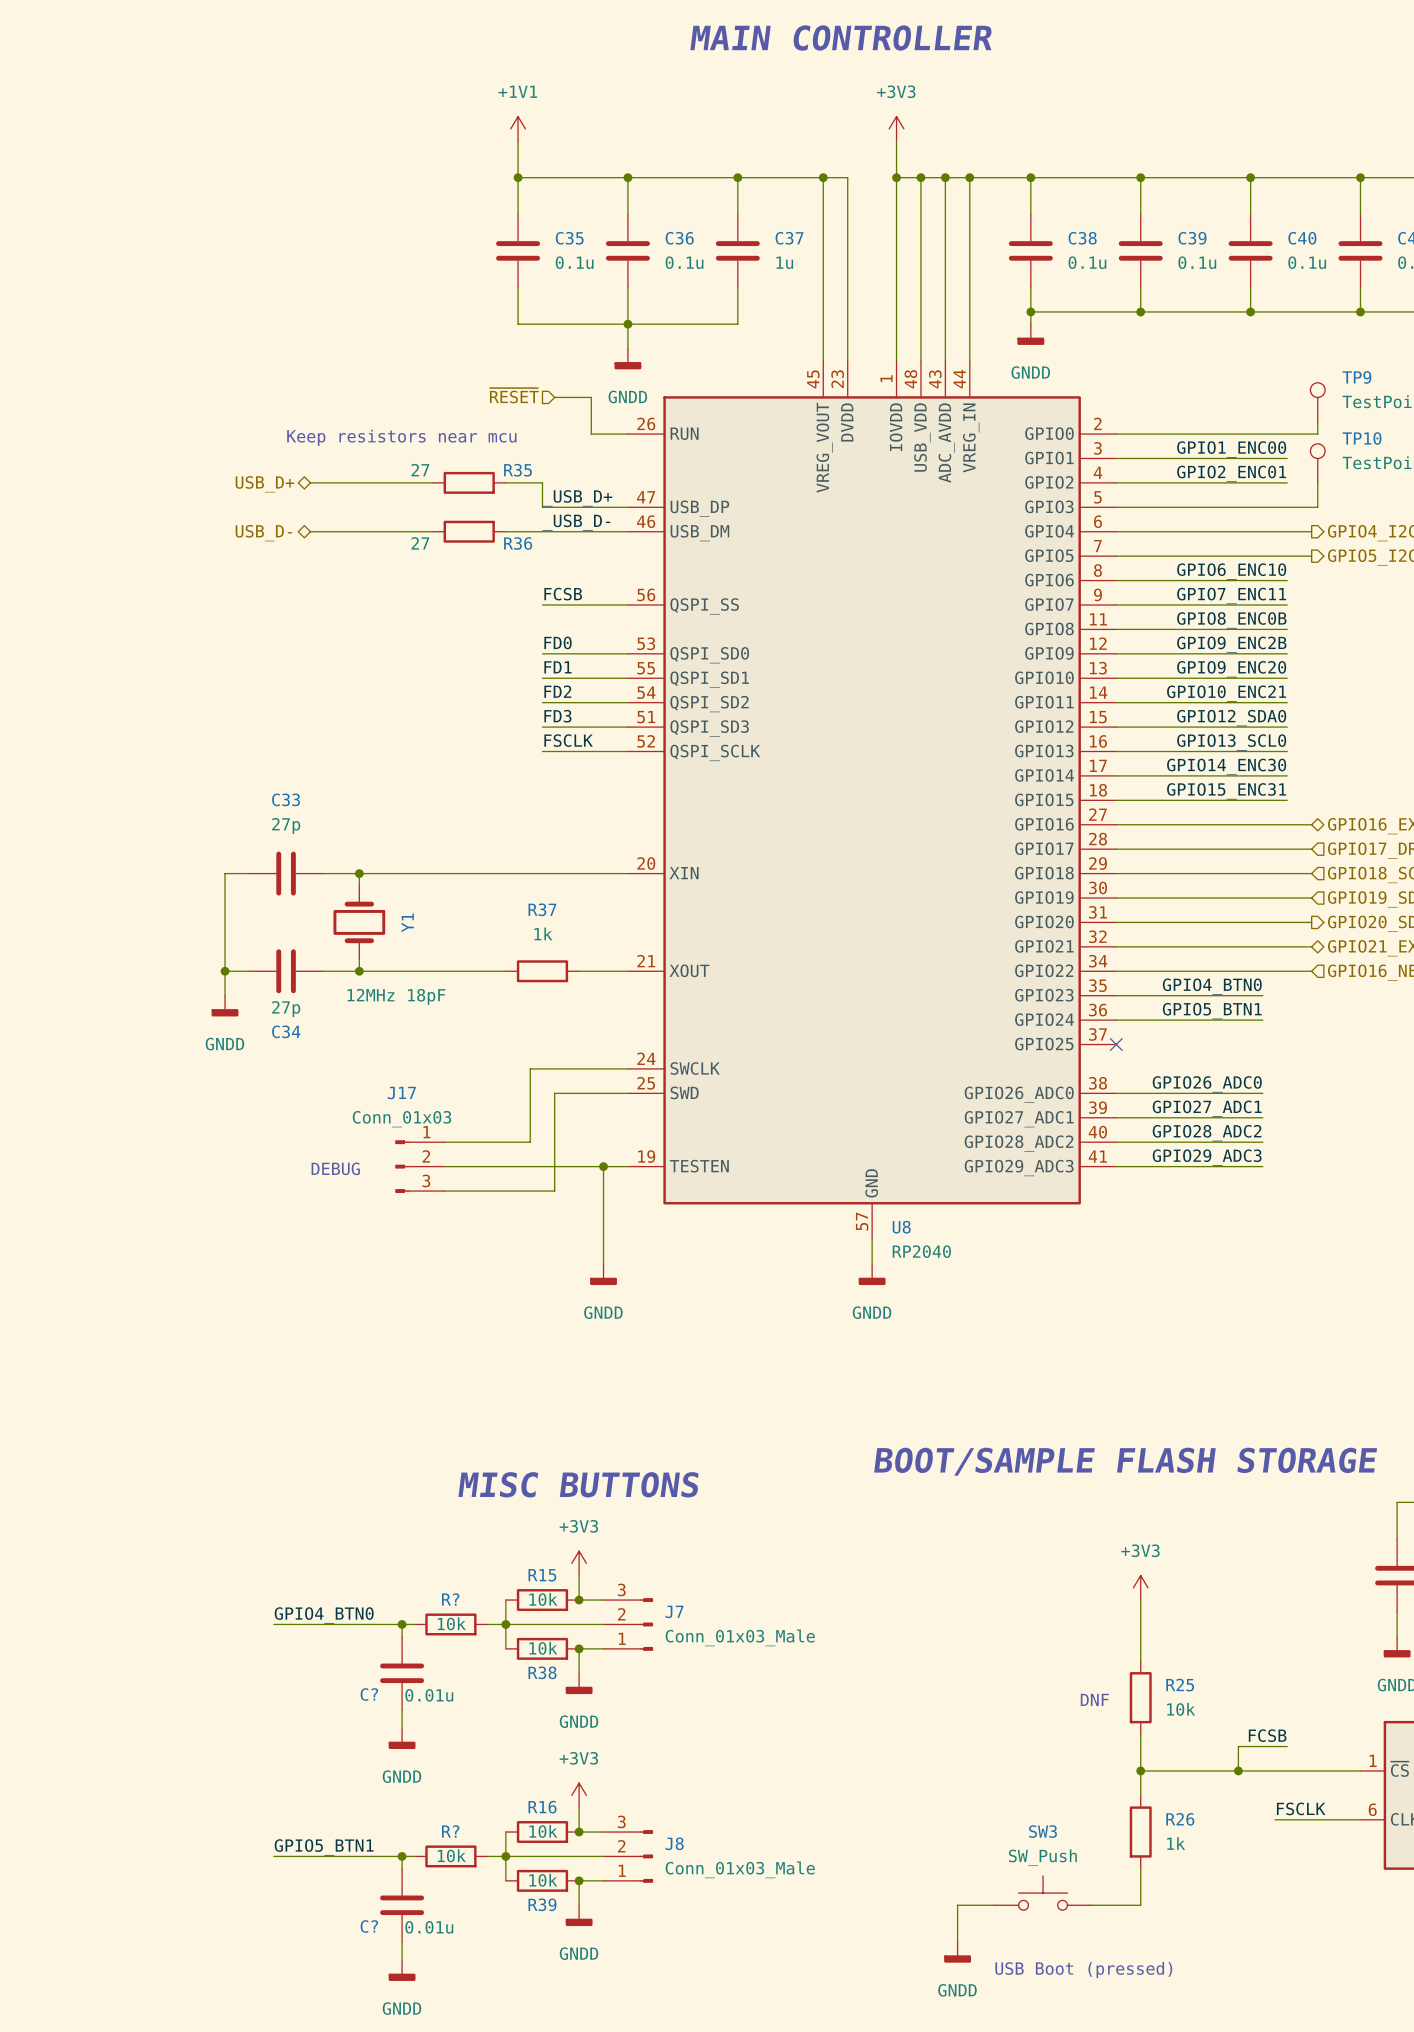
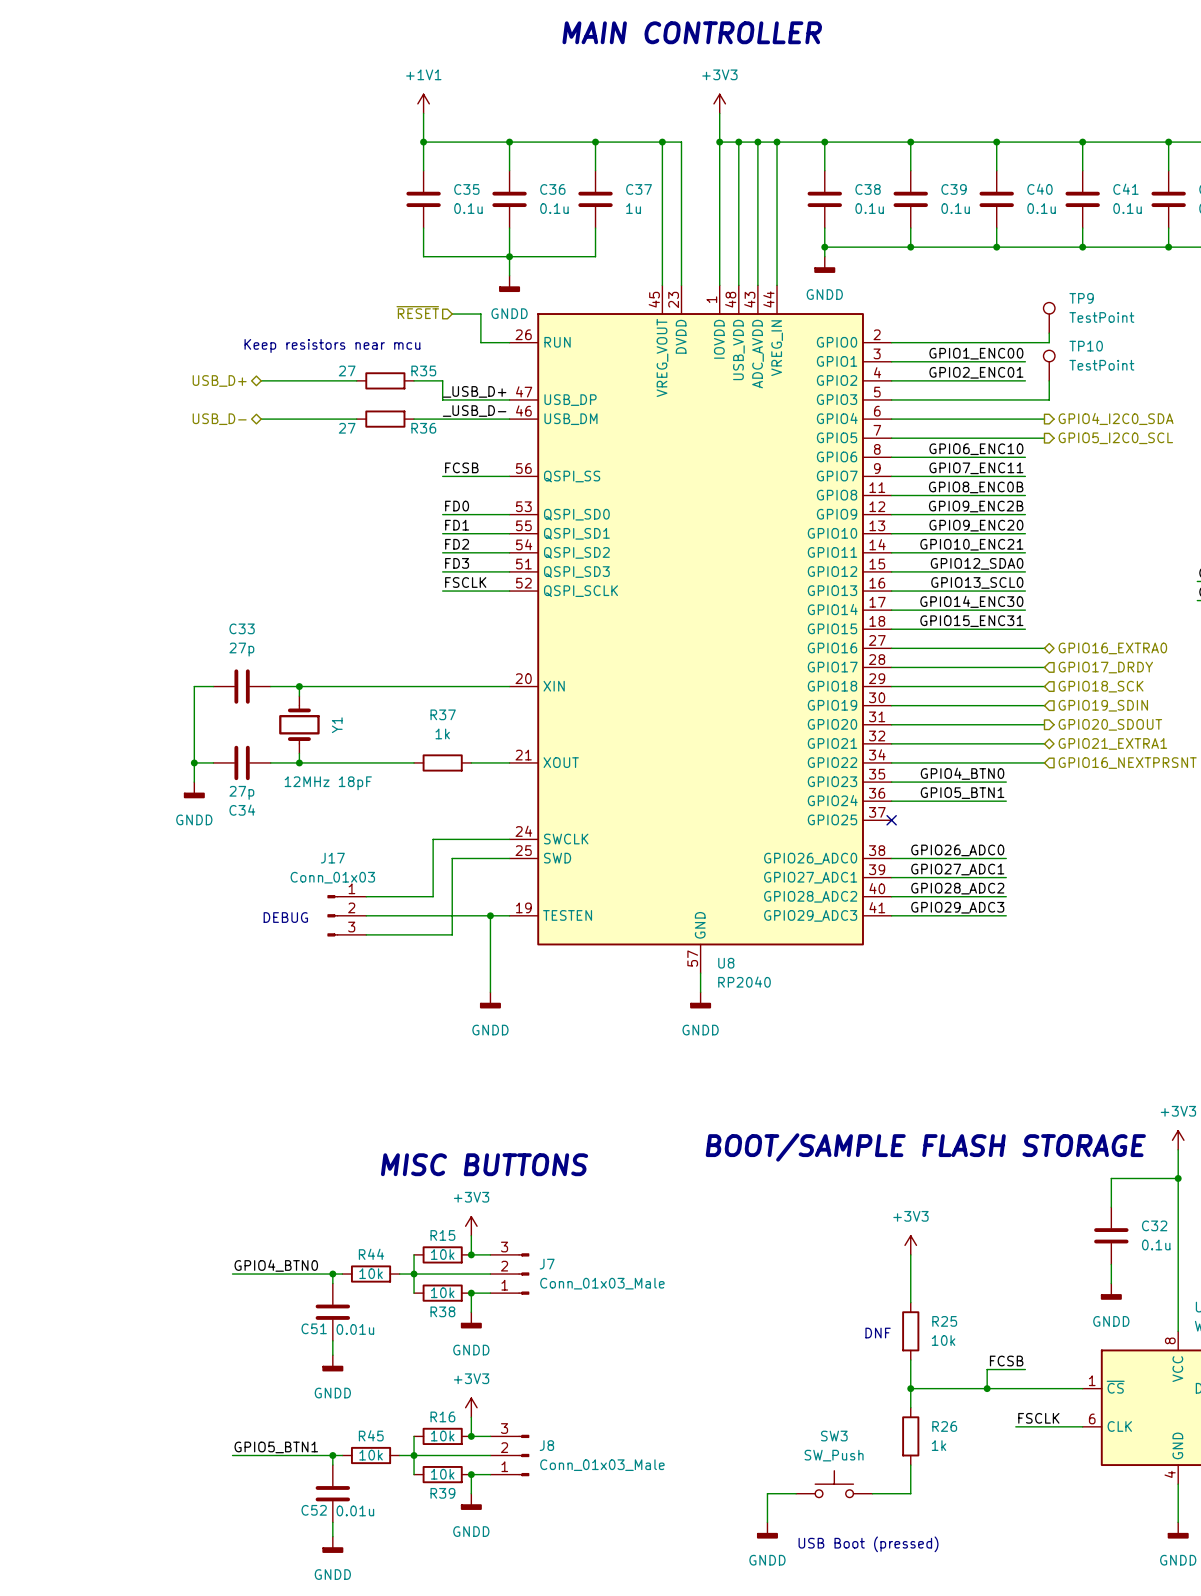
R? name: R? (450, 1599) -> R44 (371, 1254)
C? name: C? (369, 1694) -> C51 (314, 1328)
R? name: R? (450, 1831) -> R45 (371, 1435)
C? name: C? (369, 1926) -> C52 (314, 1510)

